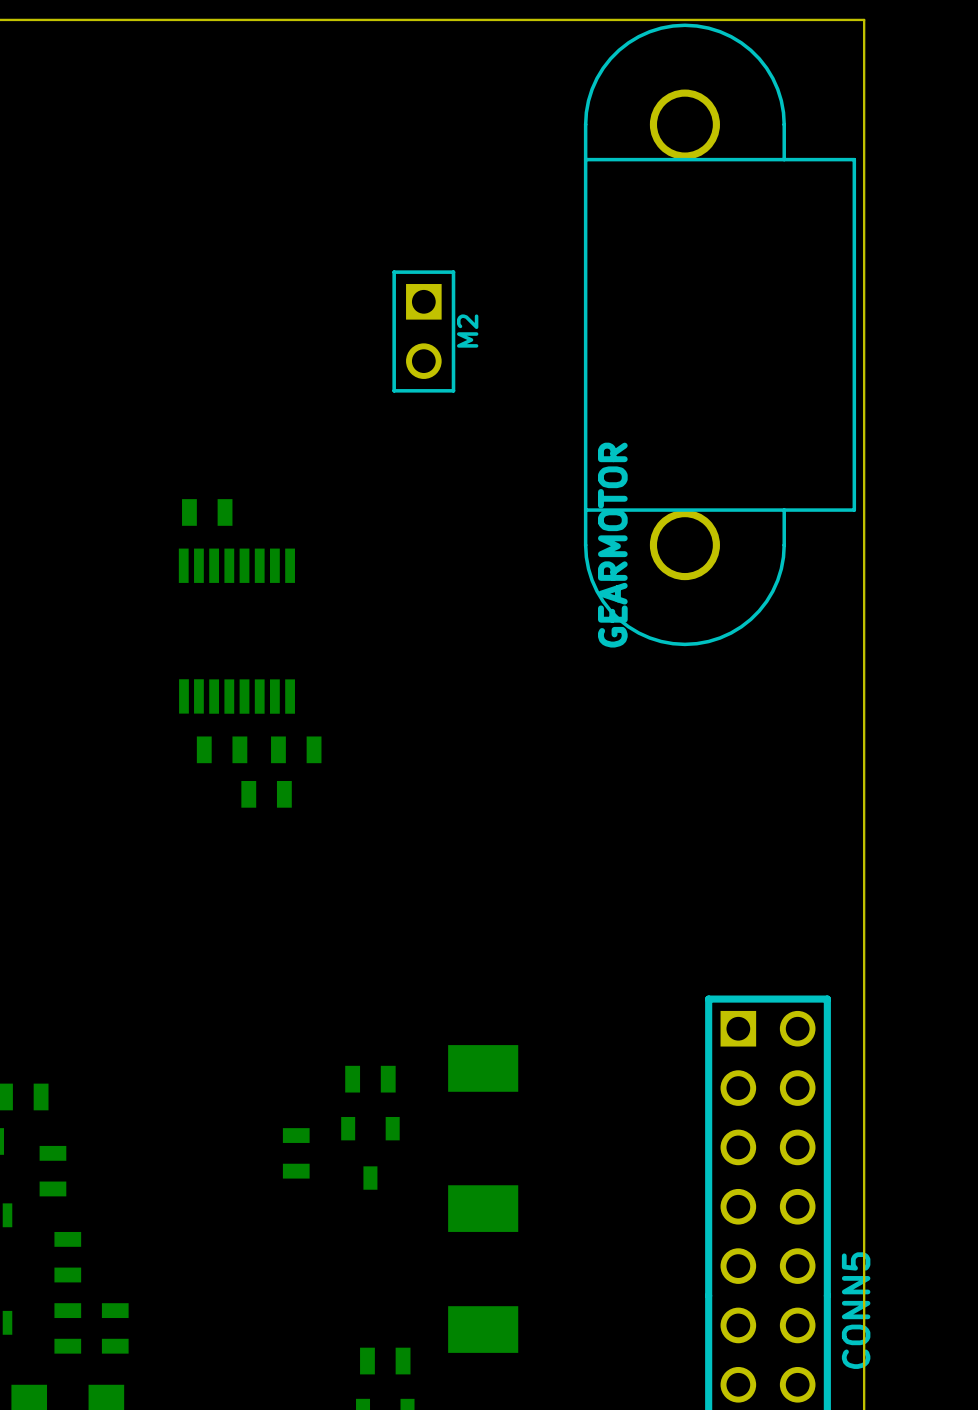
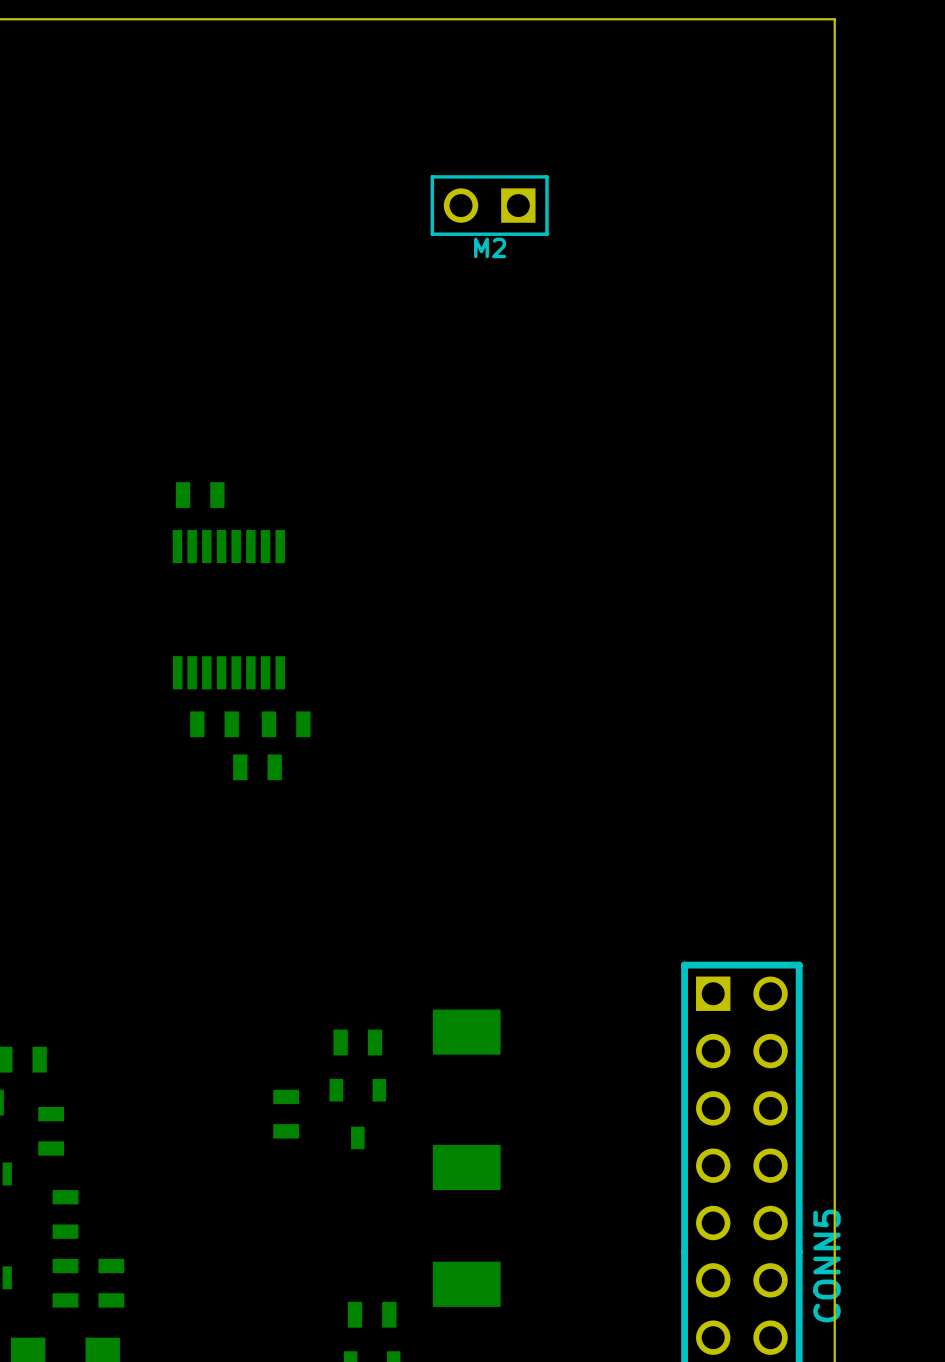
M2 rotation: 0° (423, 331) -> 90° clockwise (489, 205)
M2 position: (423, 331) -> (489, 205)
GEARMOTOR: (719, 334) -> none

